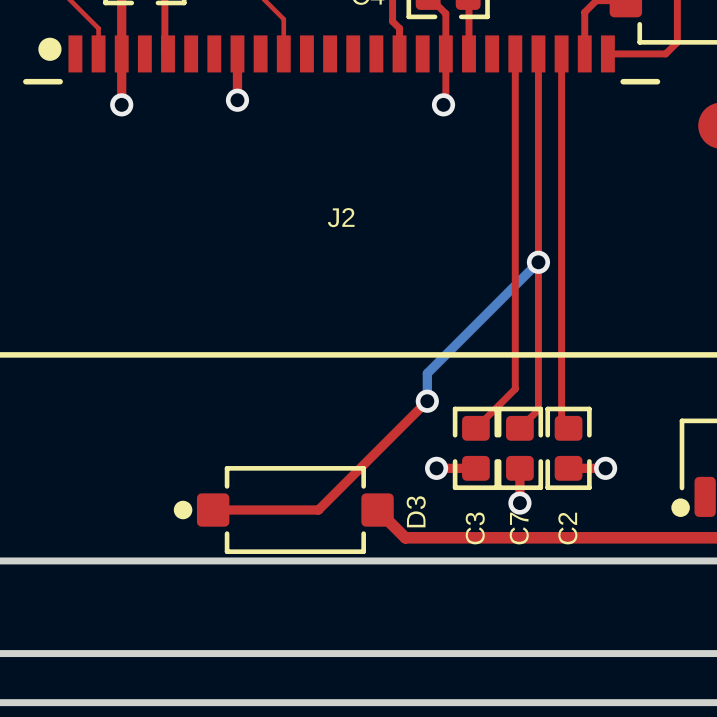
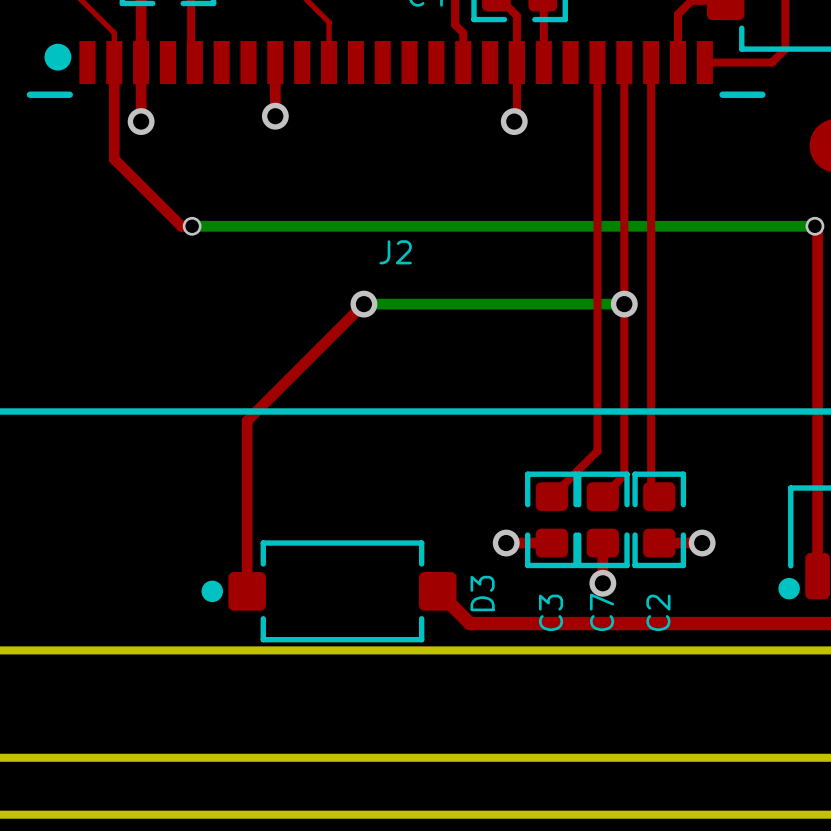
top track: none -> (114, 62) (114, 159) (181, 226) (192, 226)
bottom track: none -> (192, 226) (814, 226)
via: none -> (192, 226)
top track: none -> (814, 226) (817, 228) (817, 576)
via: none -> (814, 226)
bottom track: (538, 262) (427, 373) (427, 401) -> (624, 304) (363, 304)
top track: (427, 401) (318, 510) (213, 510) -> (363, 304) (247, 420) (247, 591)
via position: (427, 401) -> (363, 304)

